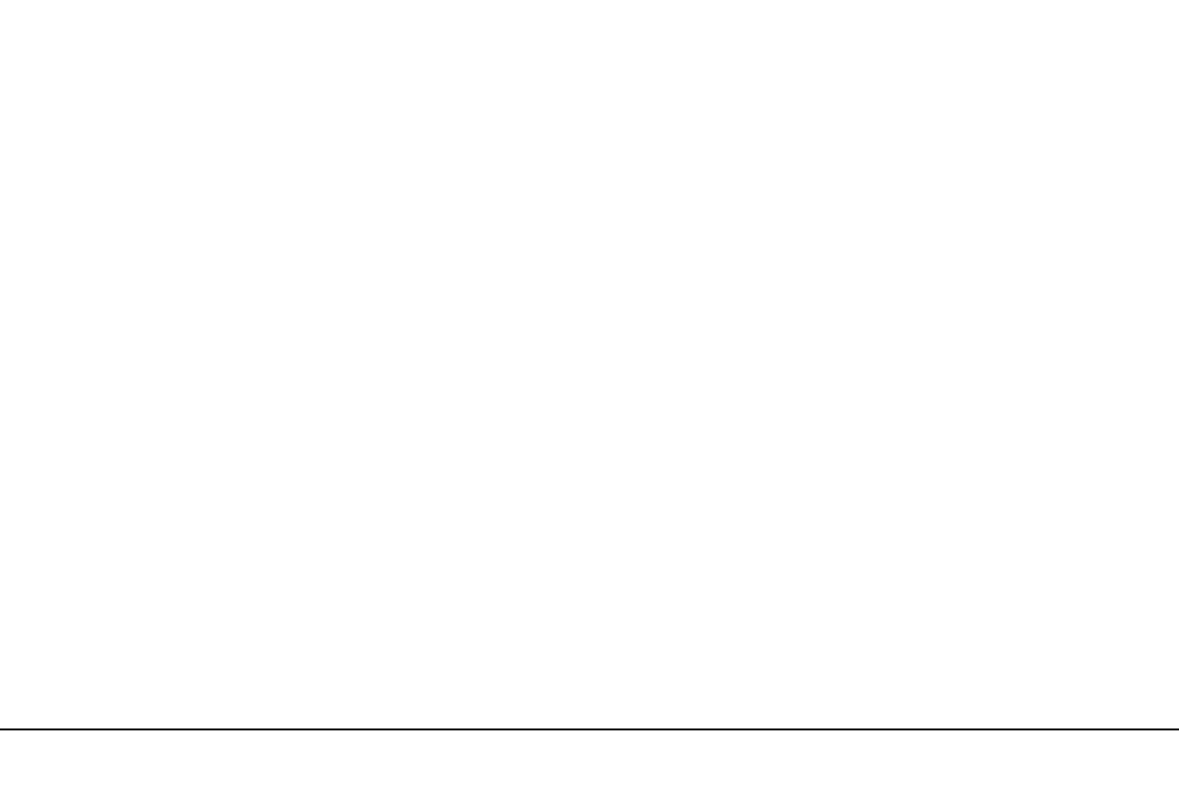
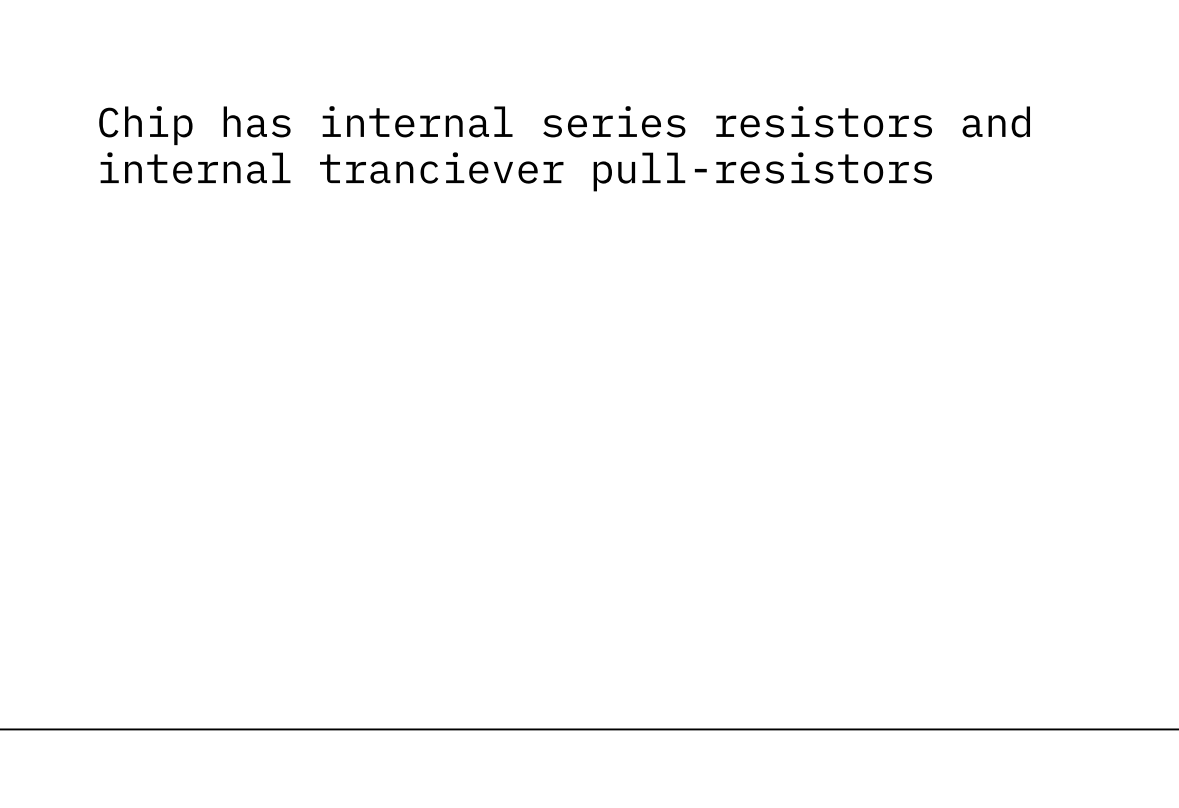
text: none -> Chip has internal series resistors and (564, 125)
text: none -> internal tranciever pull-resistors (516, 171)

